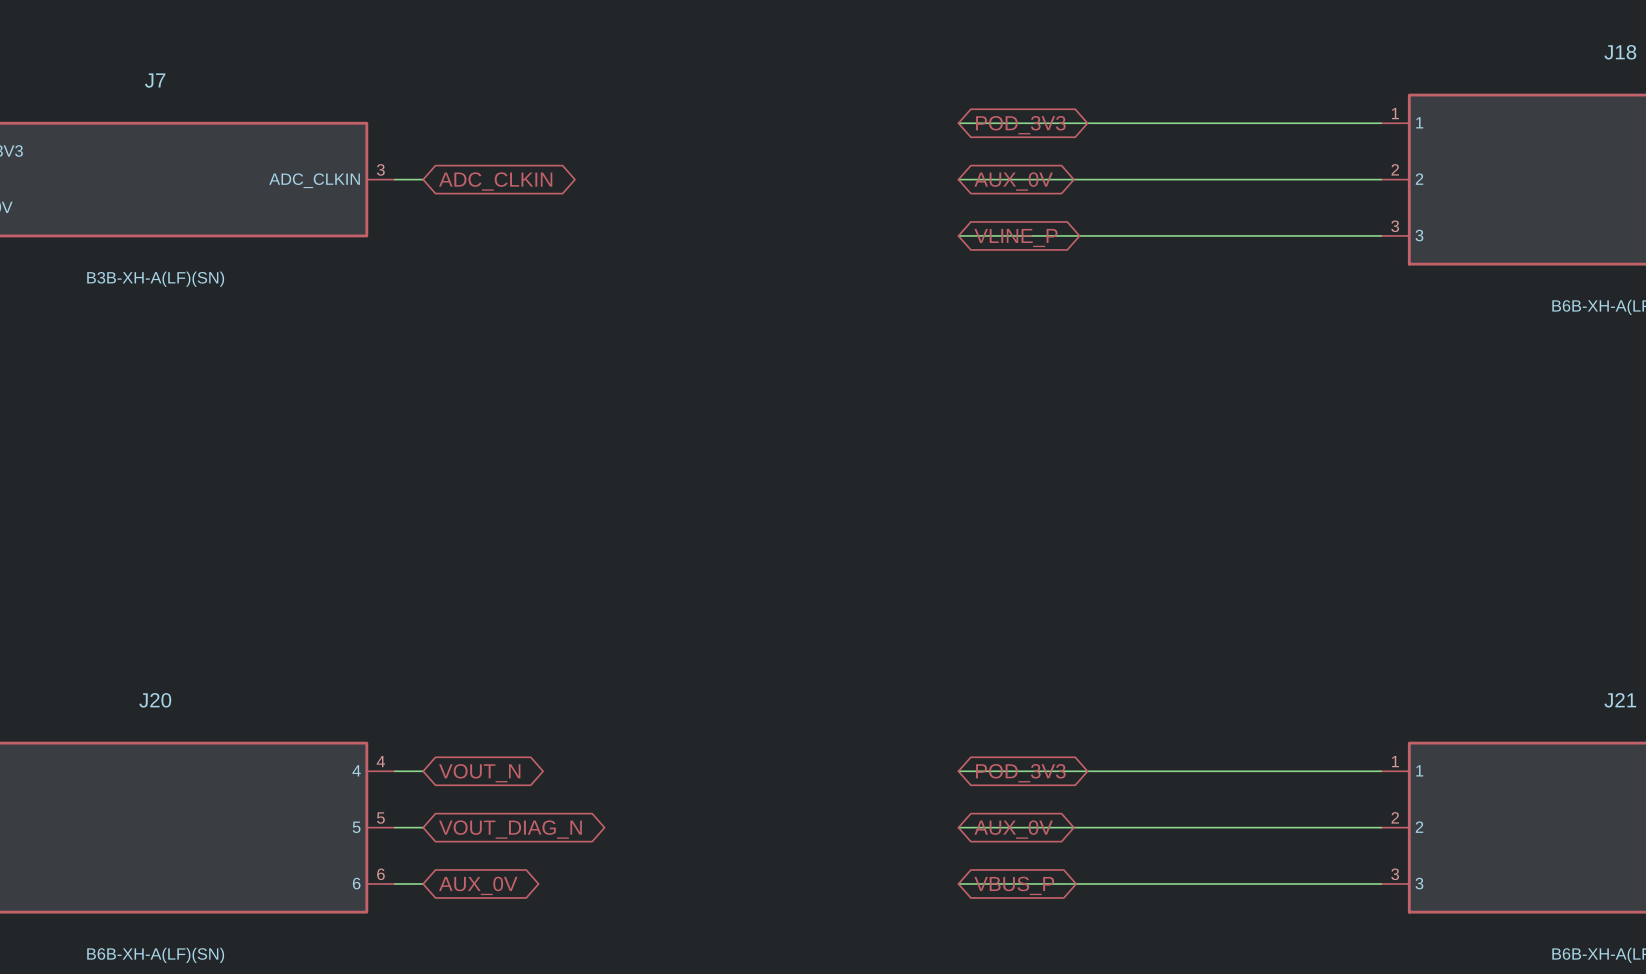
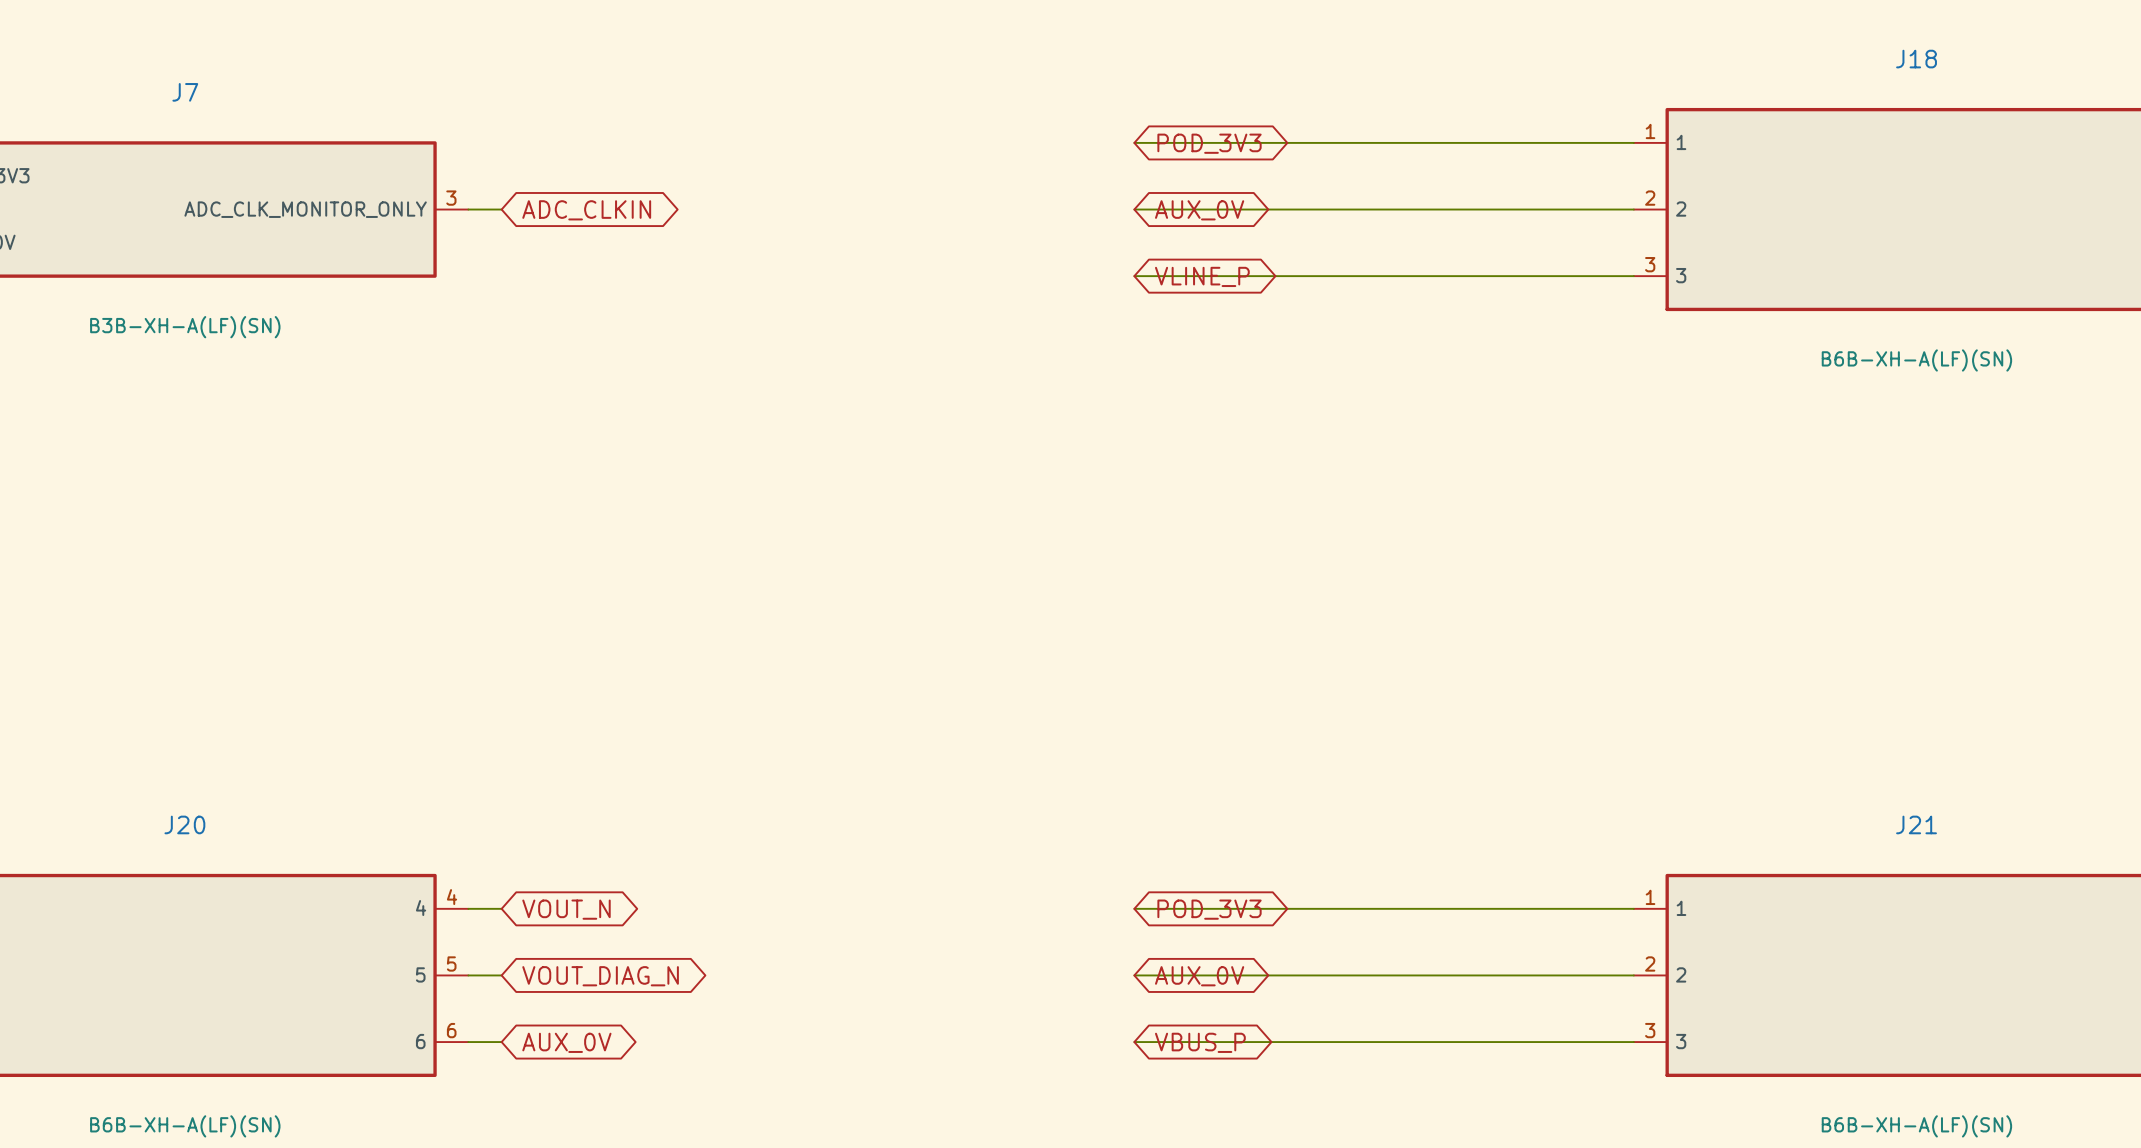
J7 pin name: ADC_CLKIN (314, 180) -> ADC_CLK_MONITOR_ONLY (305, 209)

